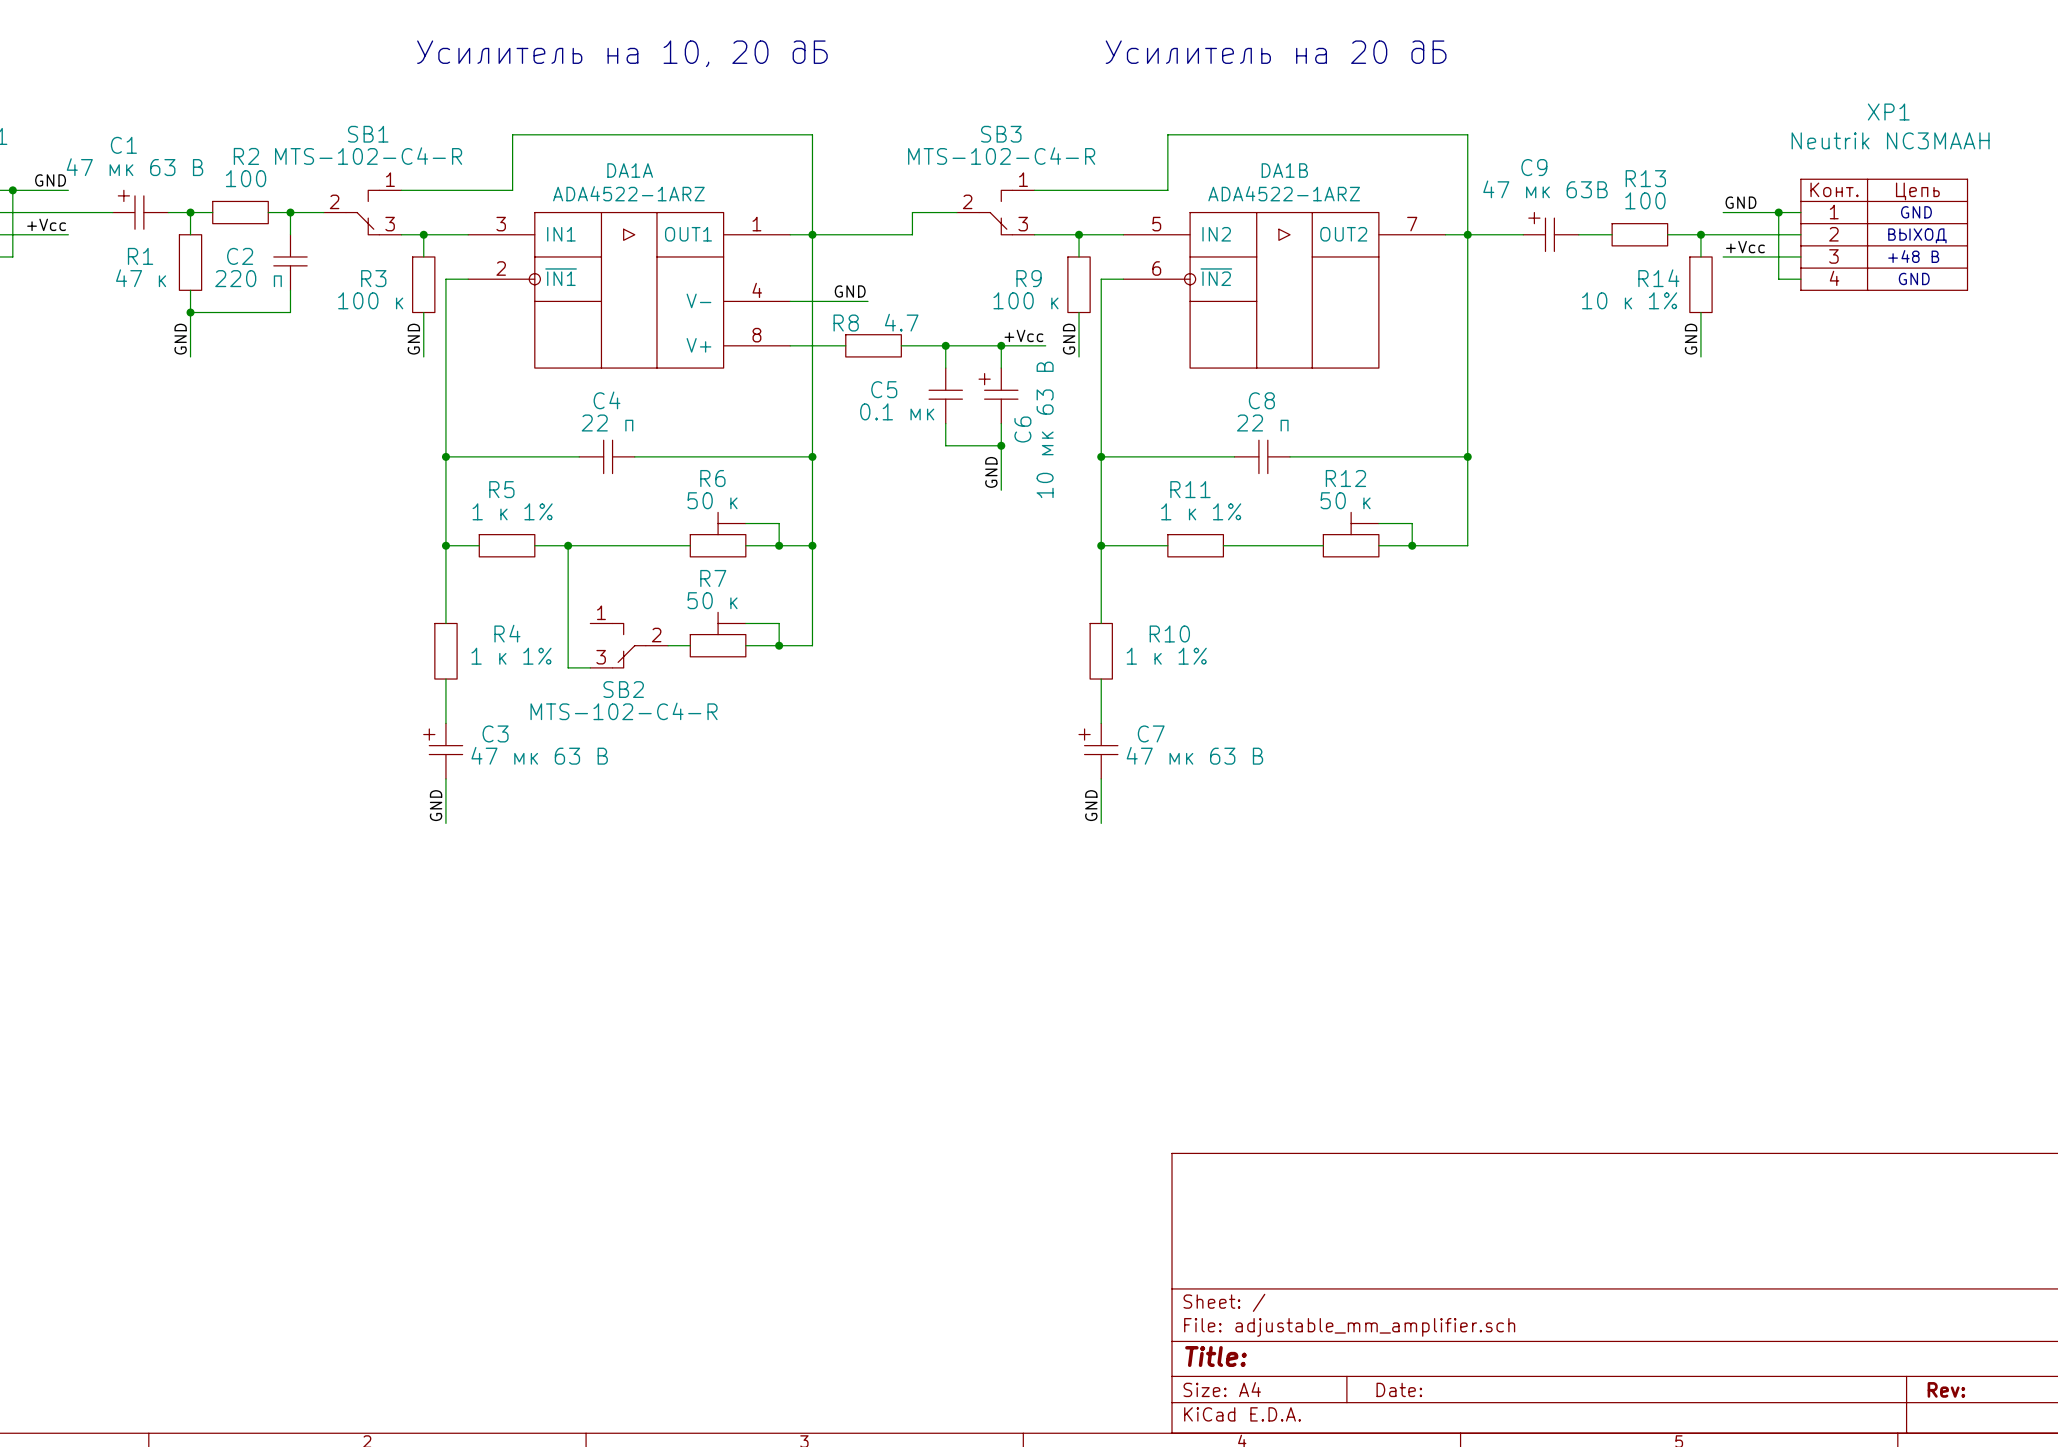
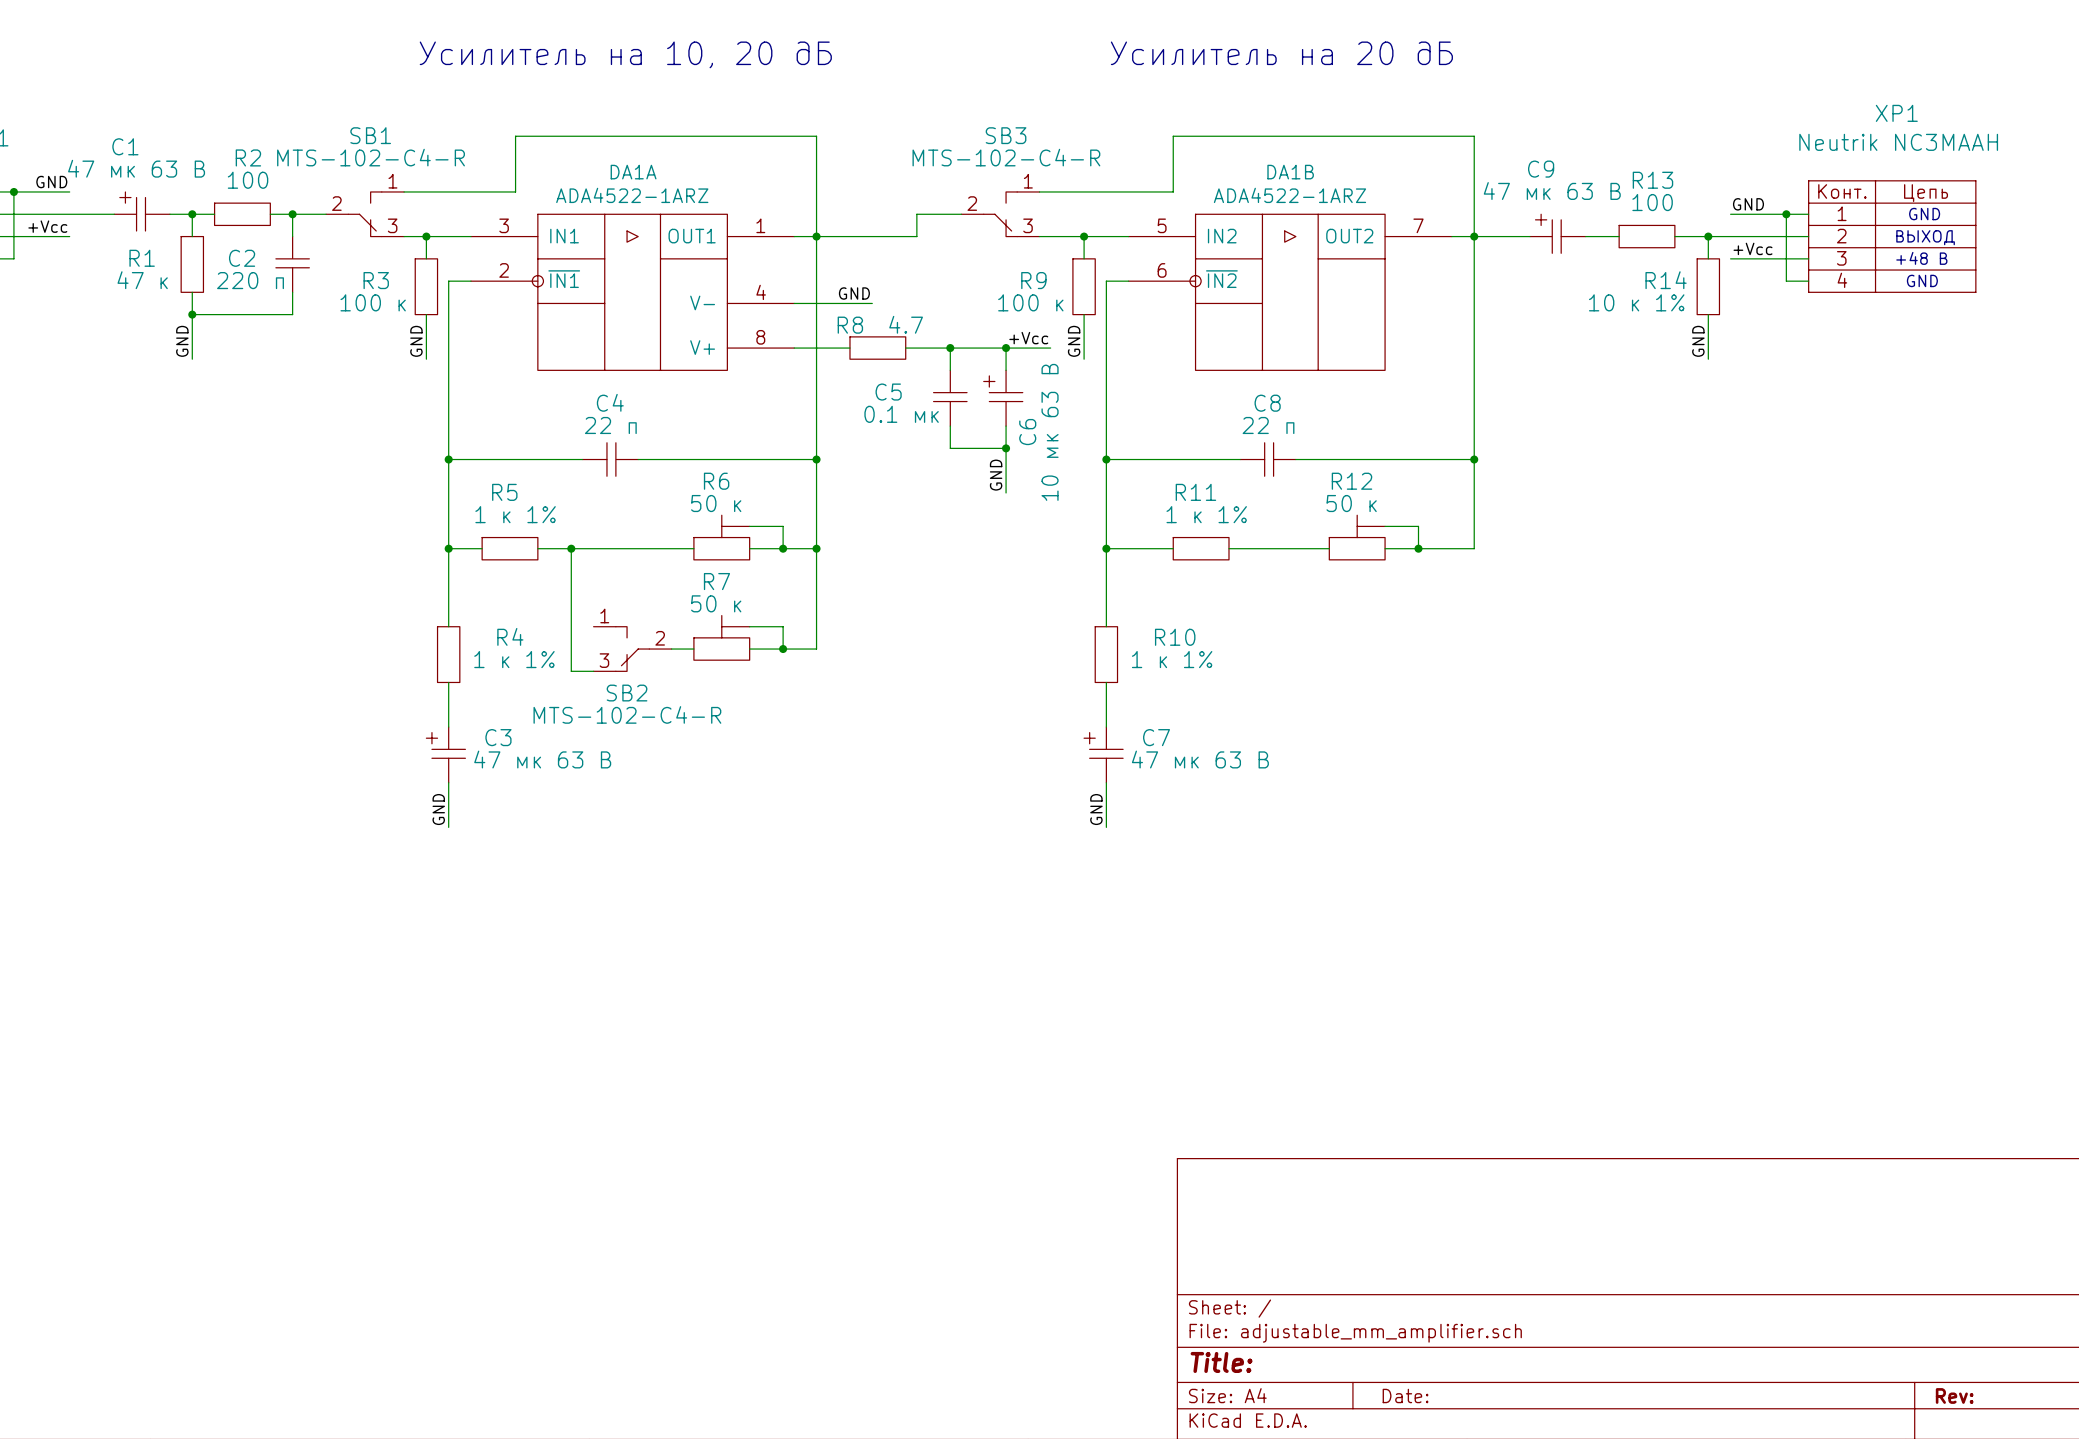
C9 value: 47 мк 63В (1545, 189) -> 47 мк 63 В (1552, 191)

